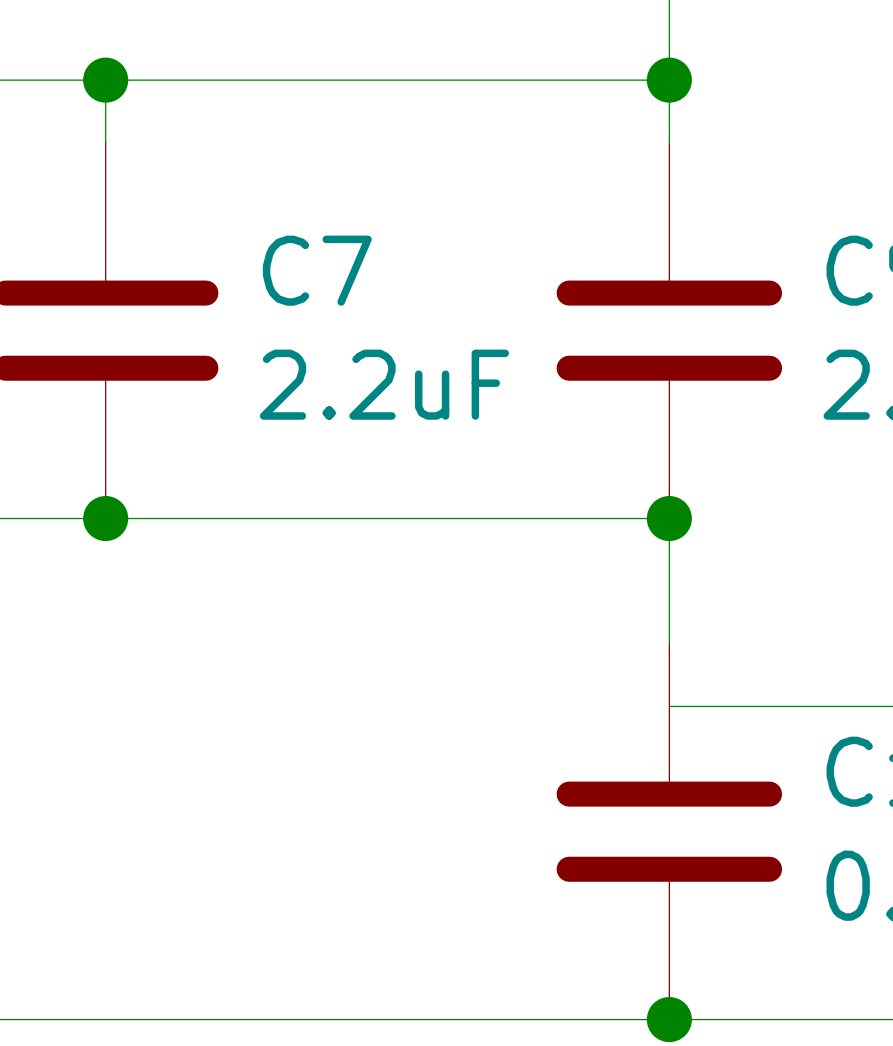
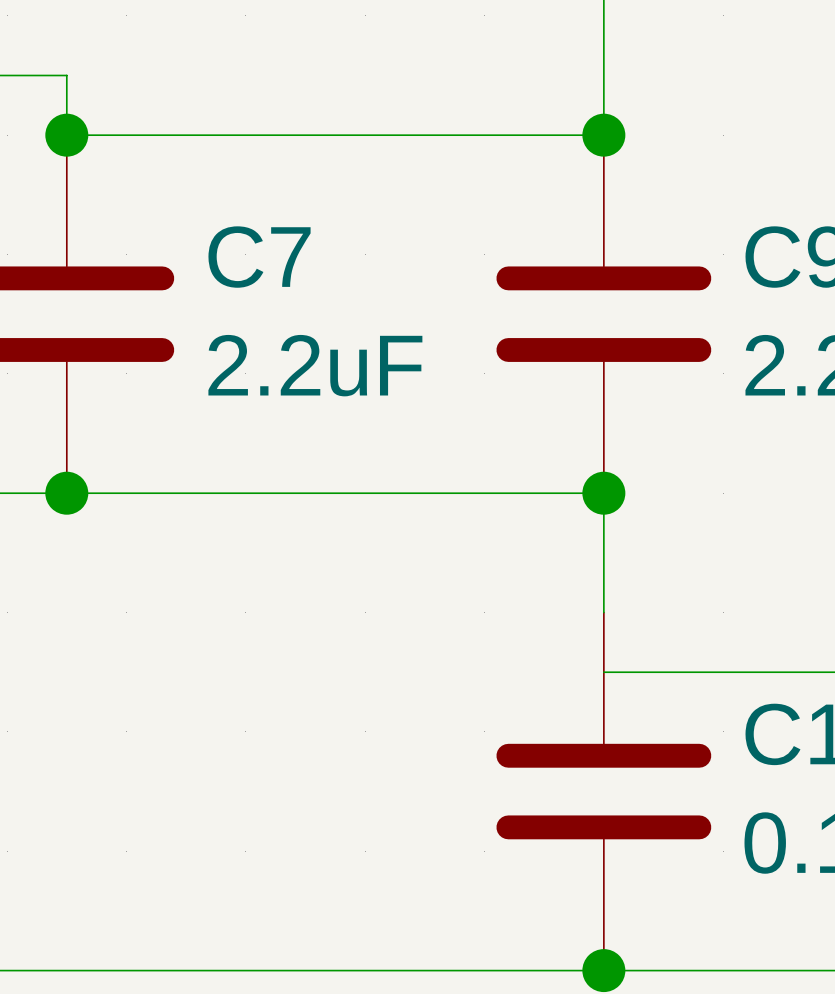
wire: (105, 80) (669, 80) -> (66, 135) (603, 135)
junction position: (105, 80) -> (66, 135)
junction position: (669, 80) -> (603, 135)

